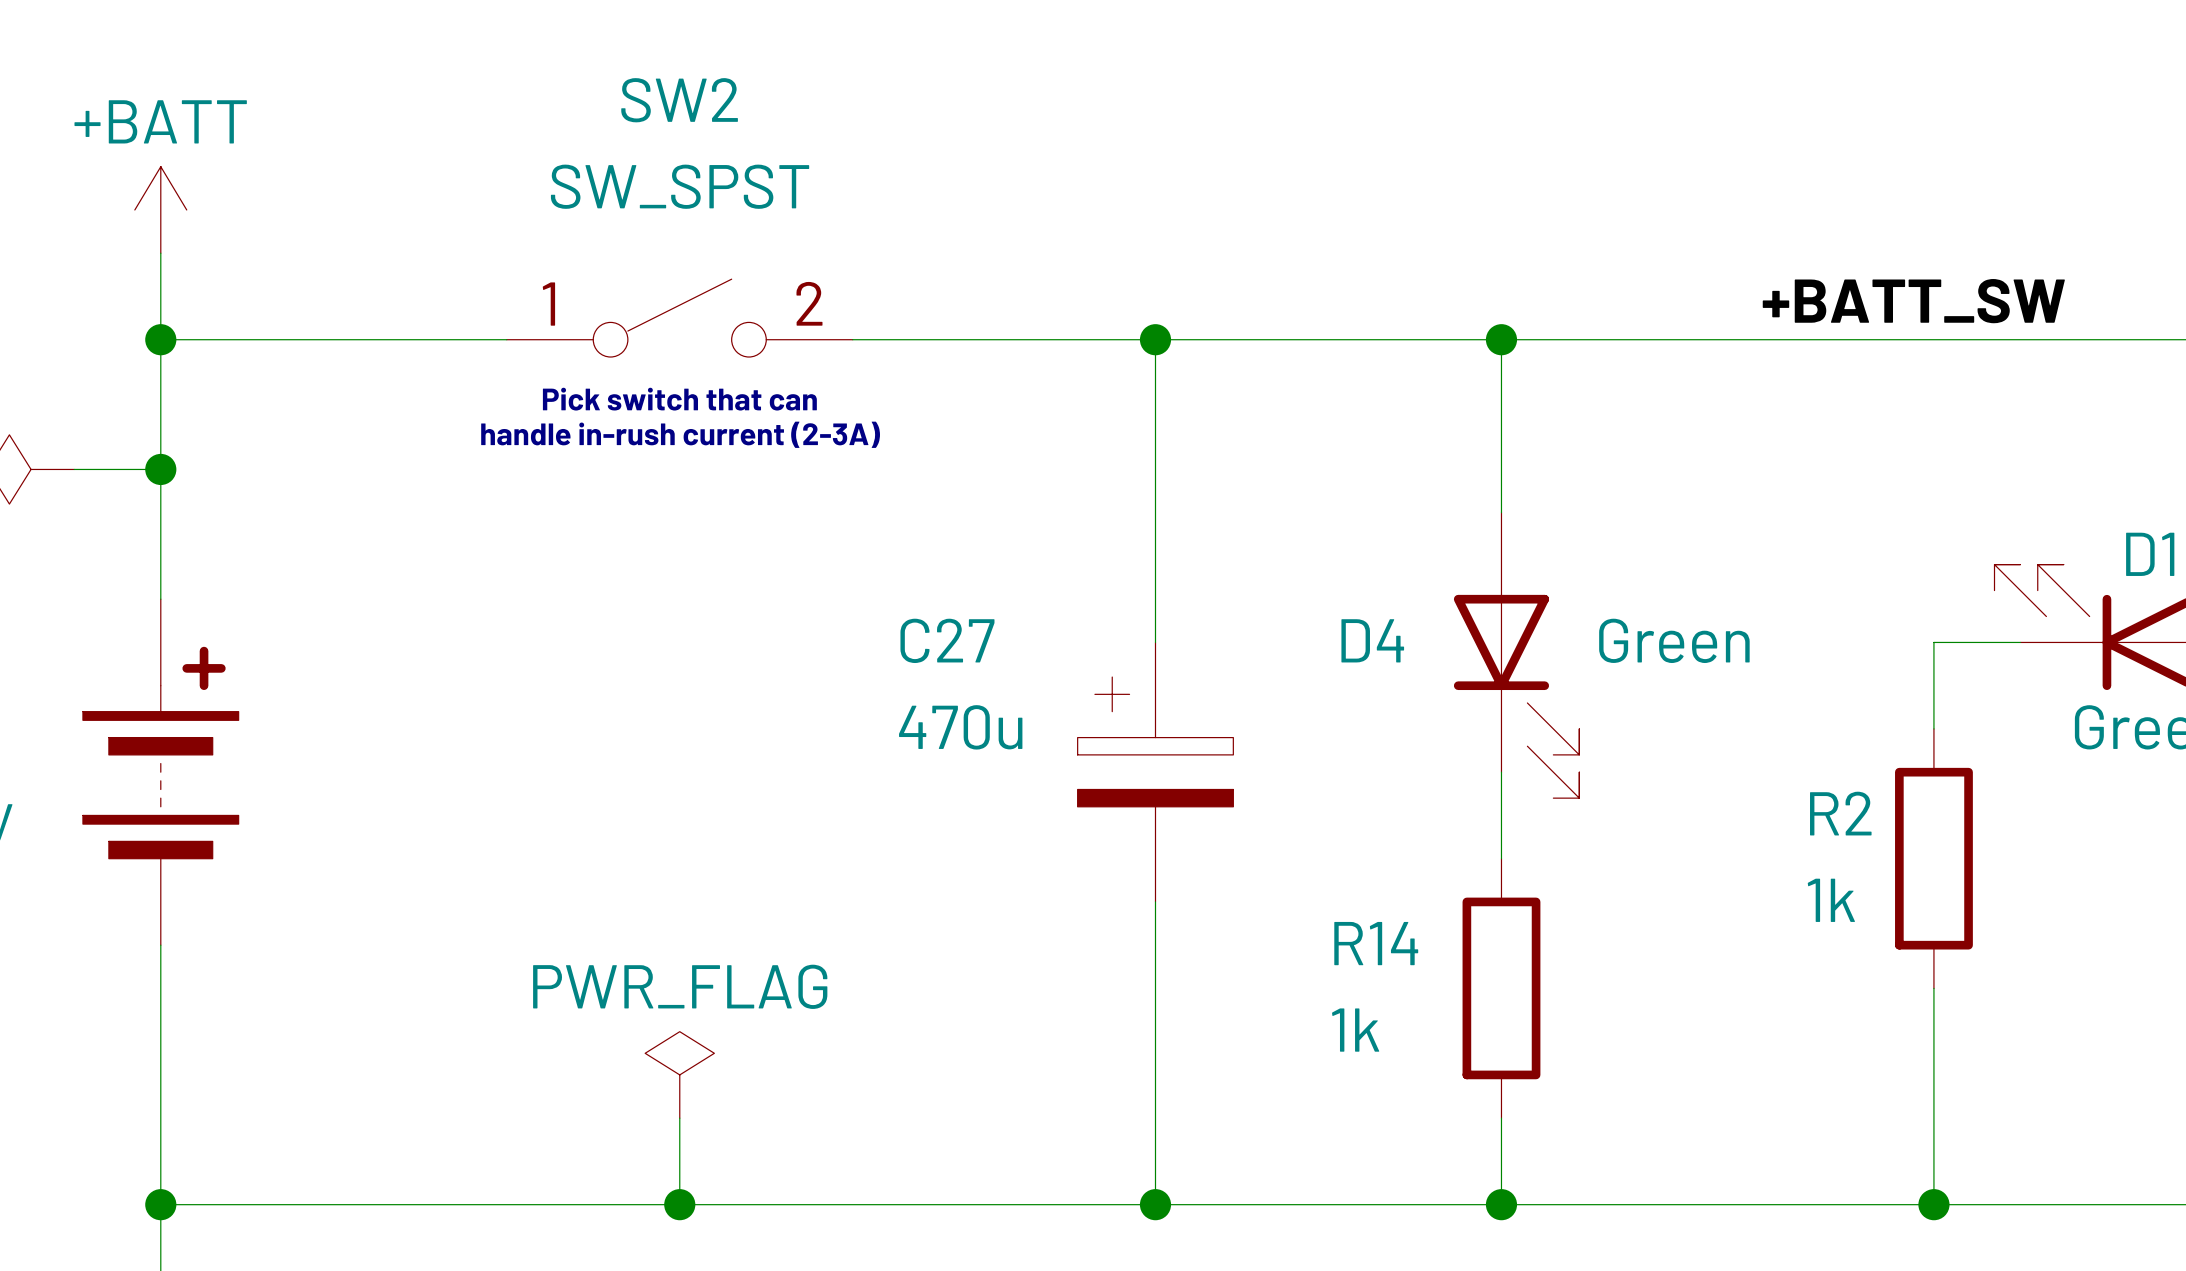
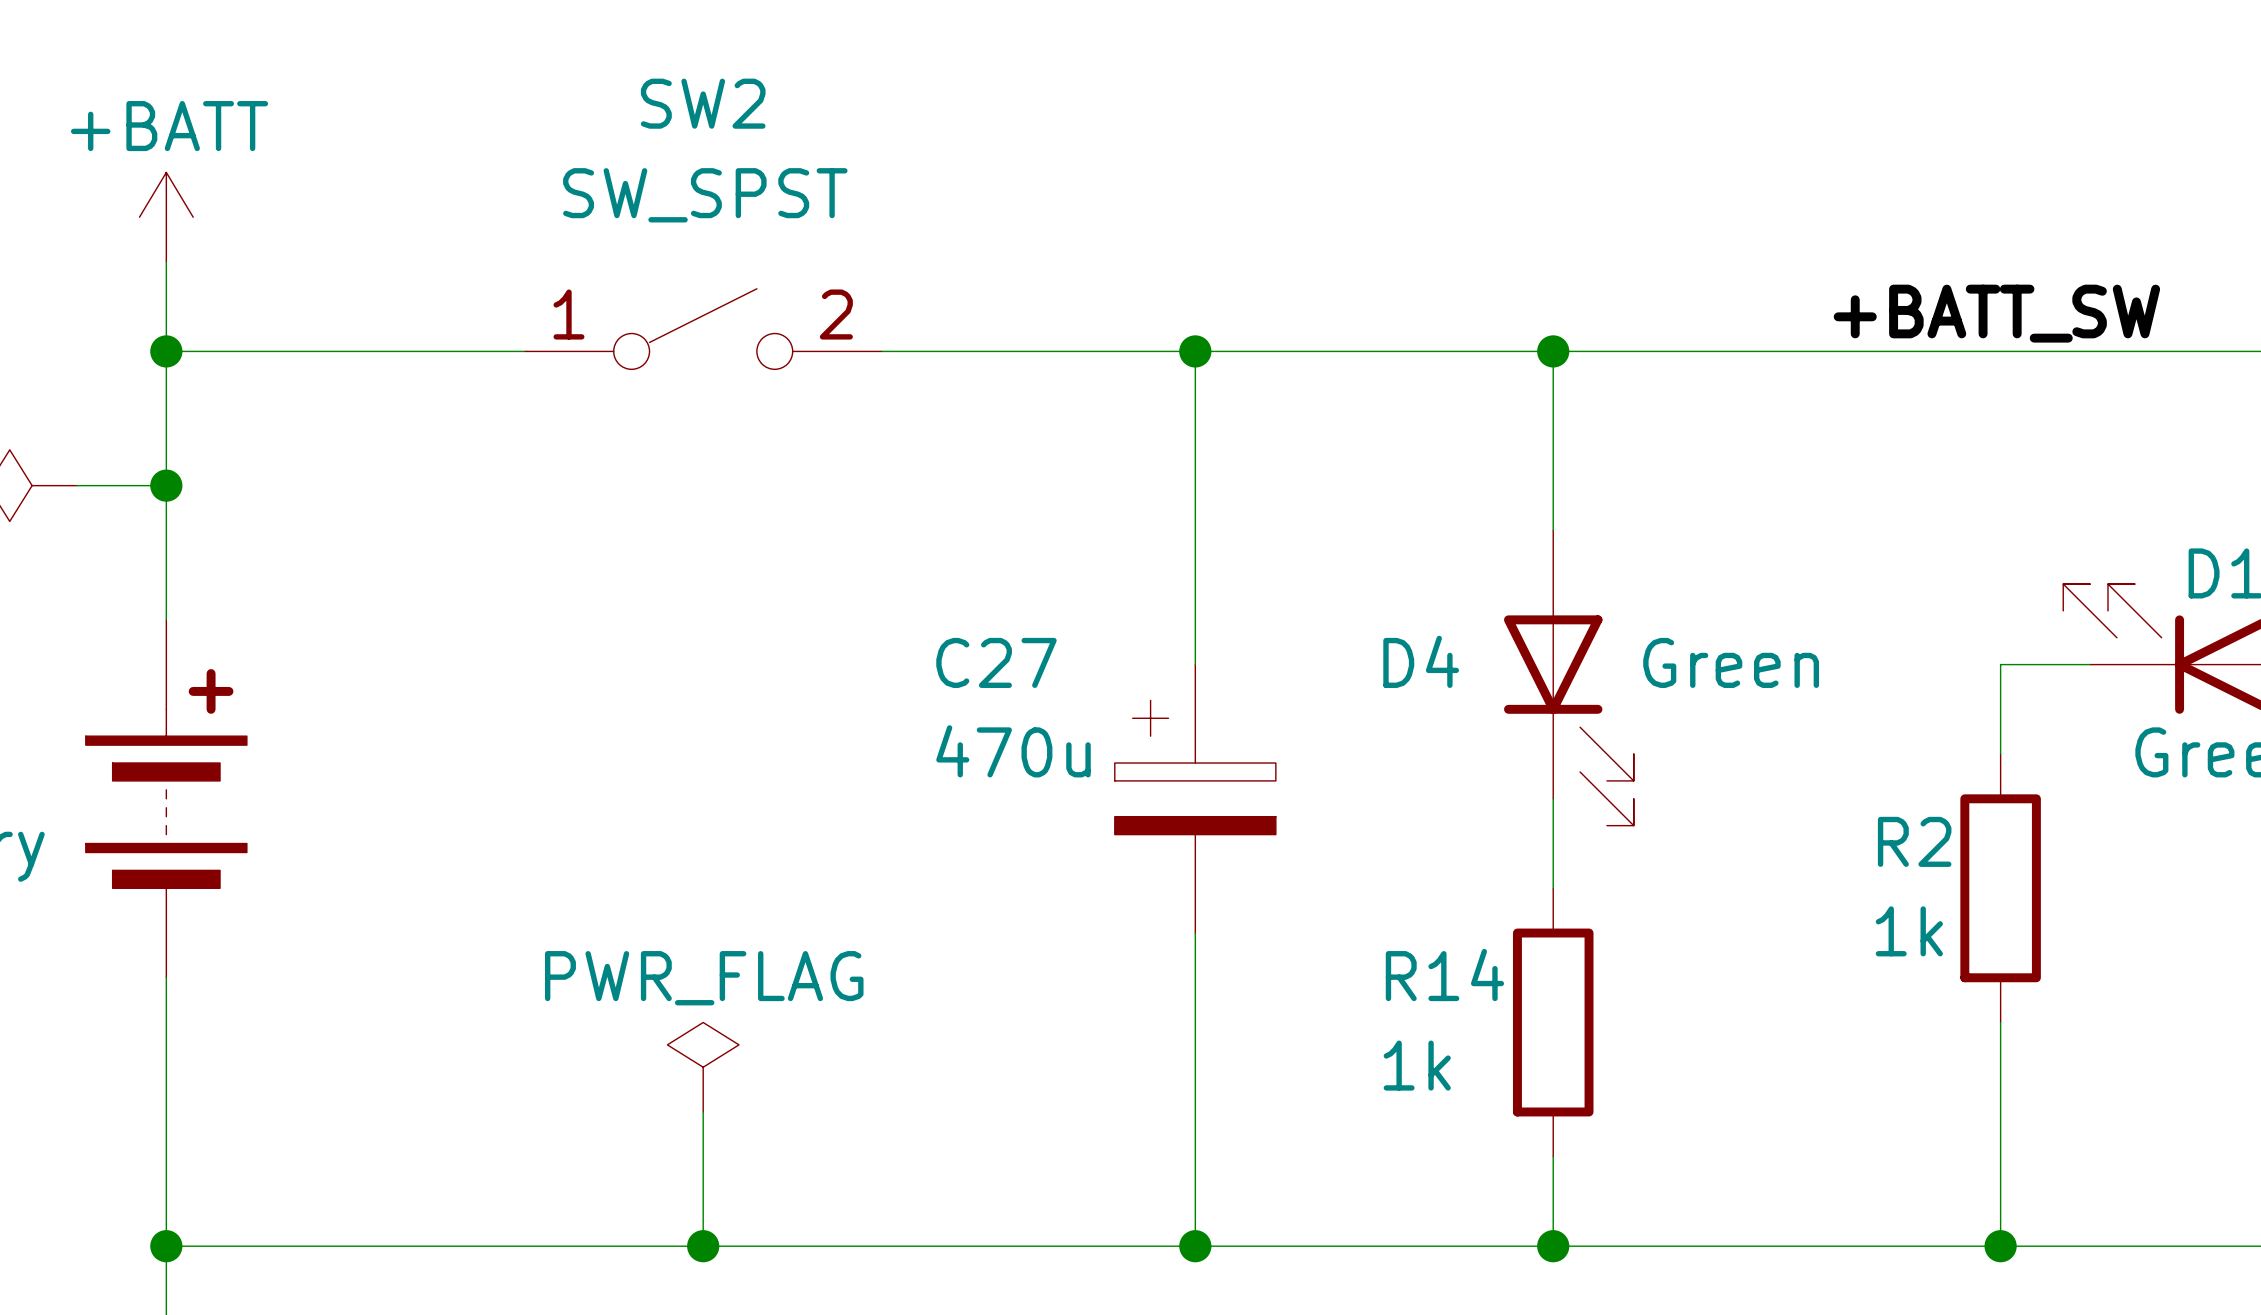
text: Pick switch that can (679, 399) -> none
text: handle in-rush current (2-3A) (680, 434) -> none
power symbol position: PWR_FLAG (679, 1074) -> PWR_FLAG (703, 1067)

